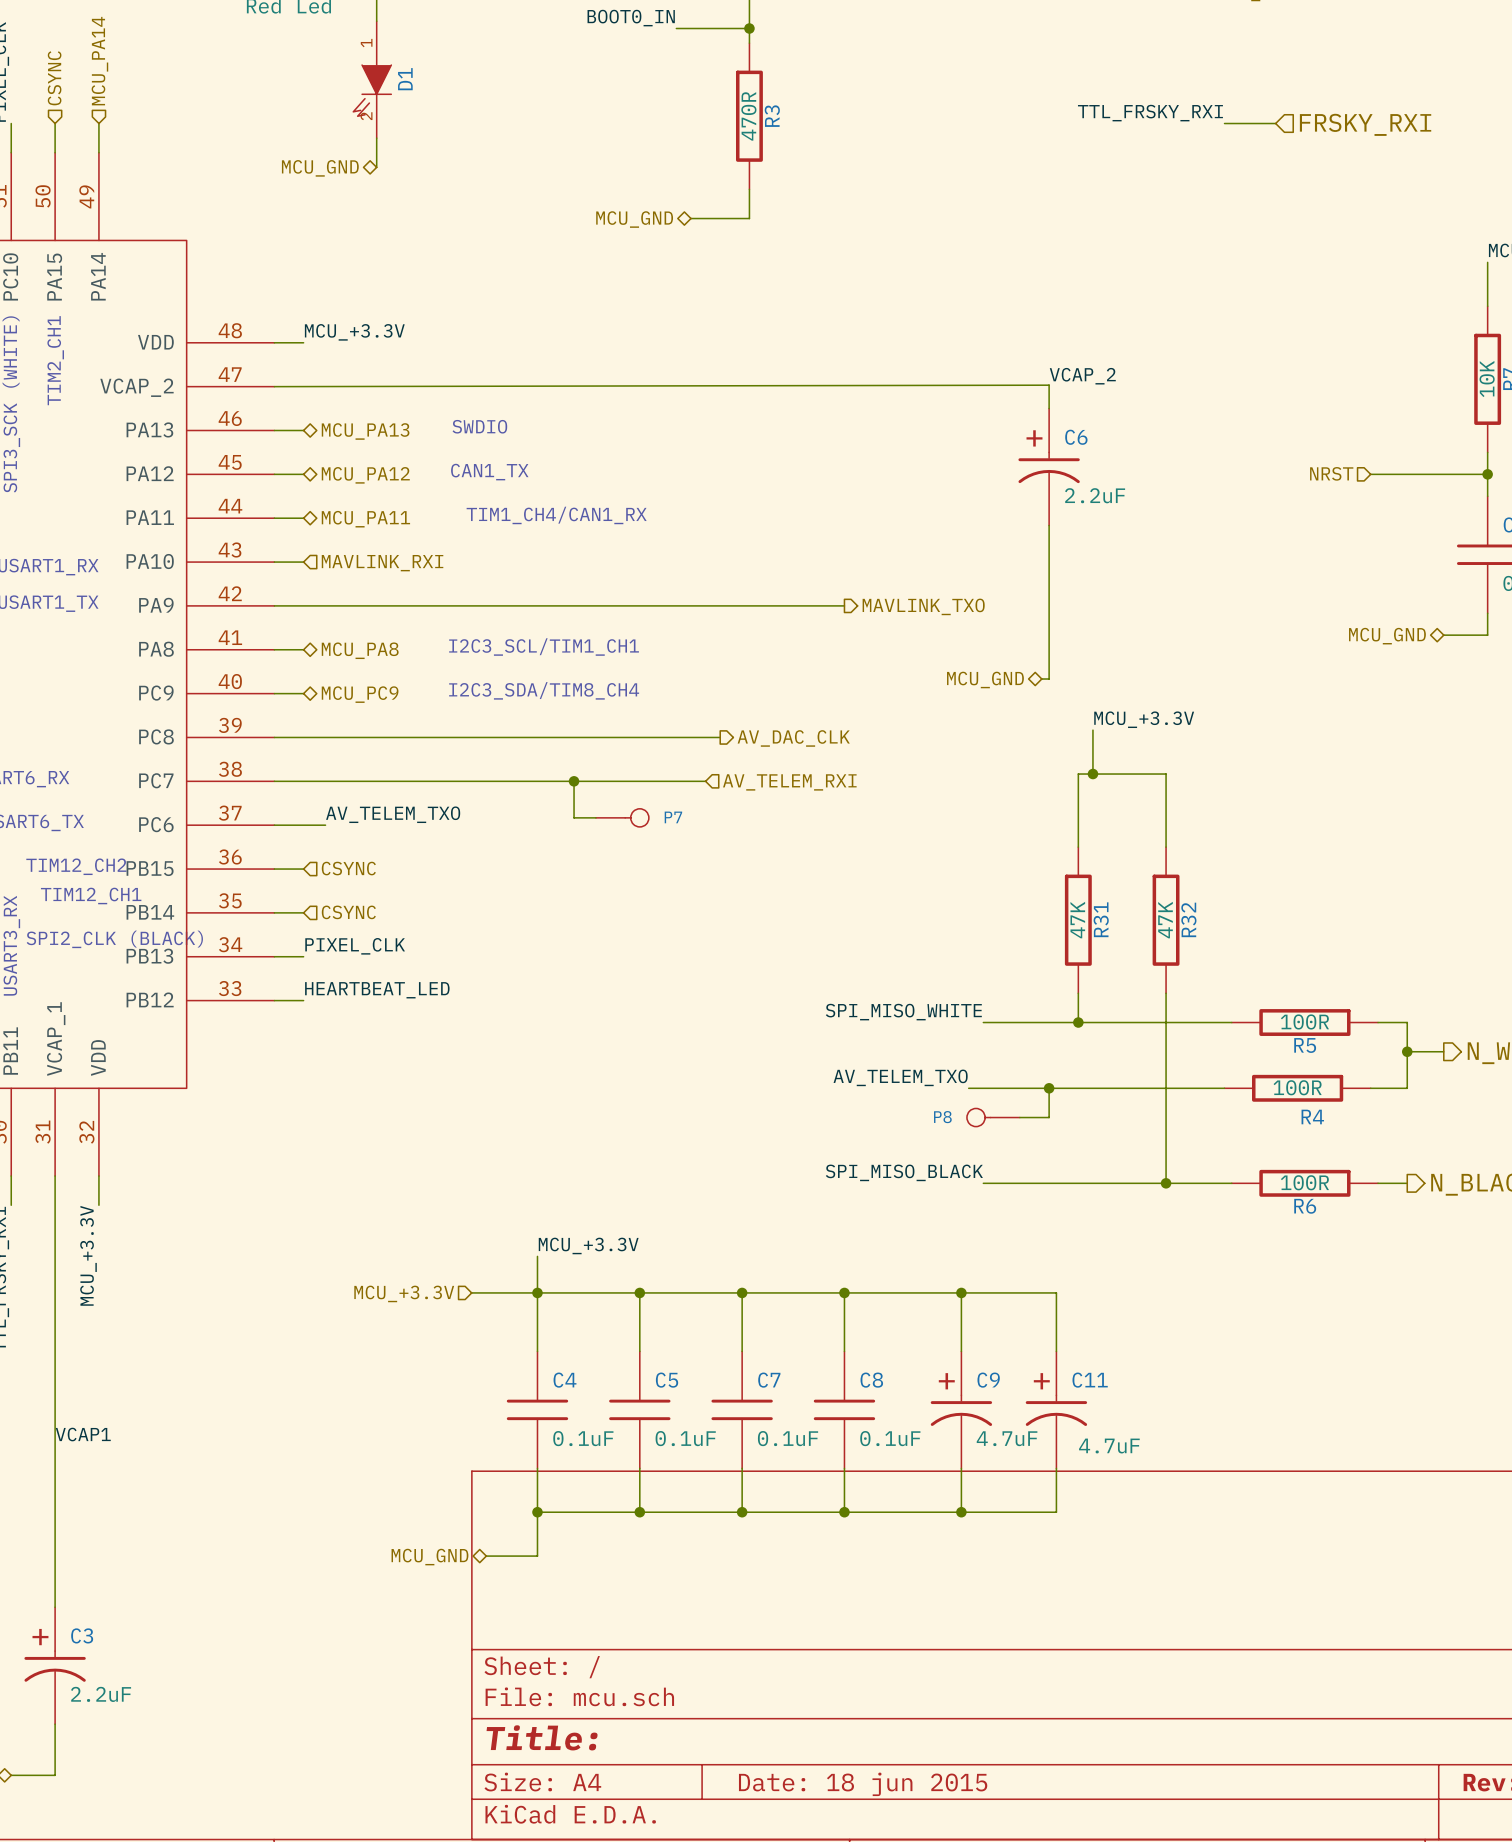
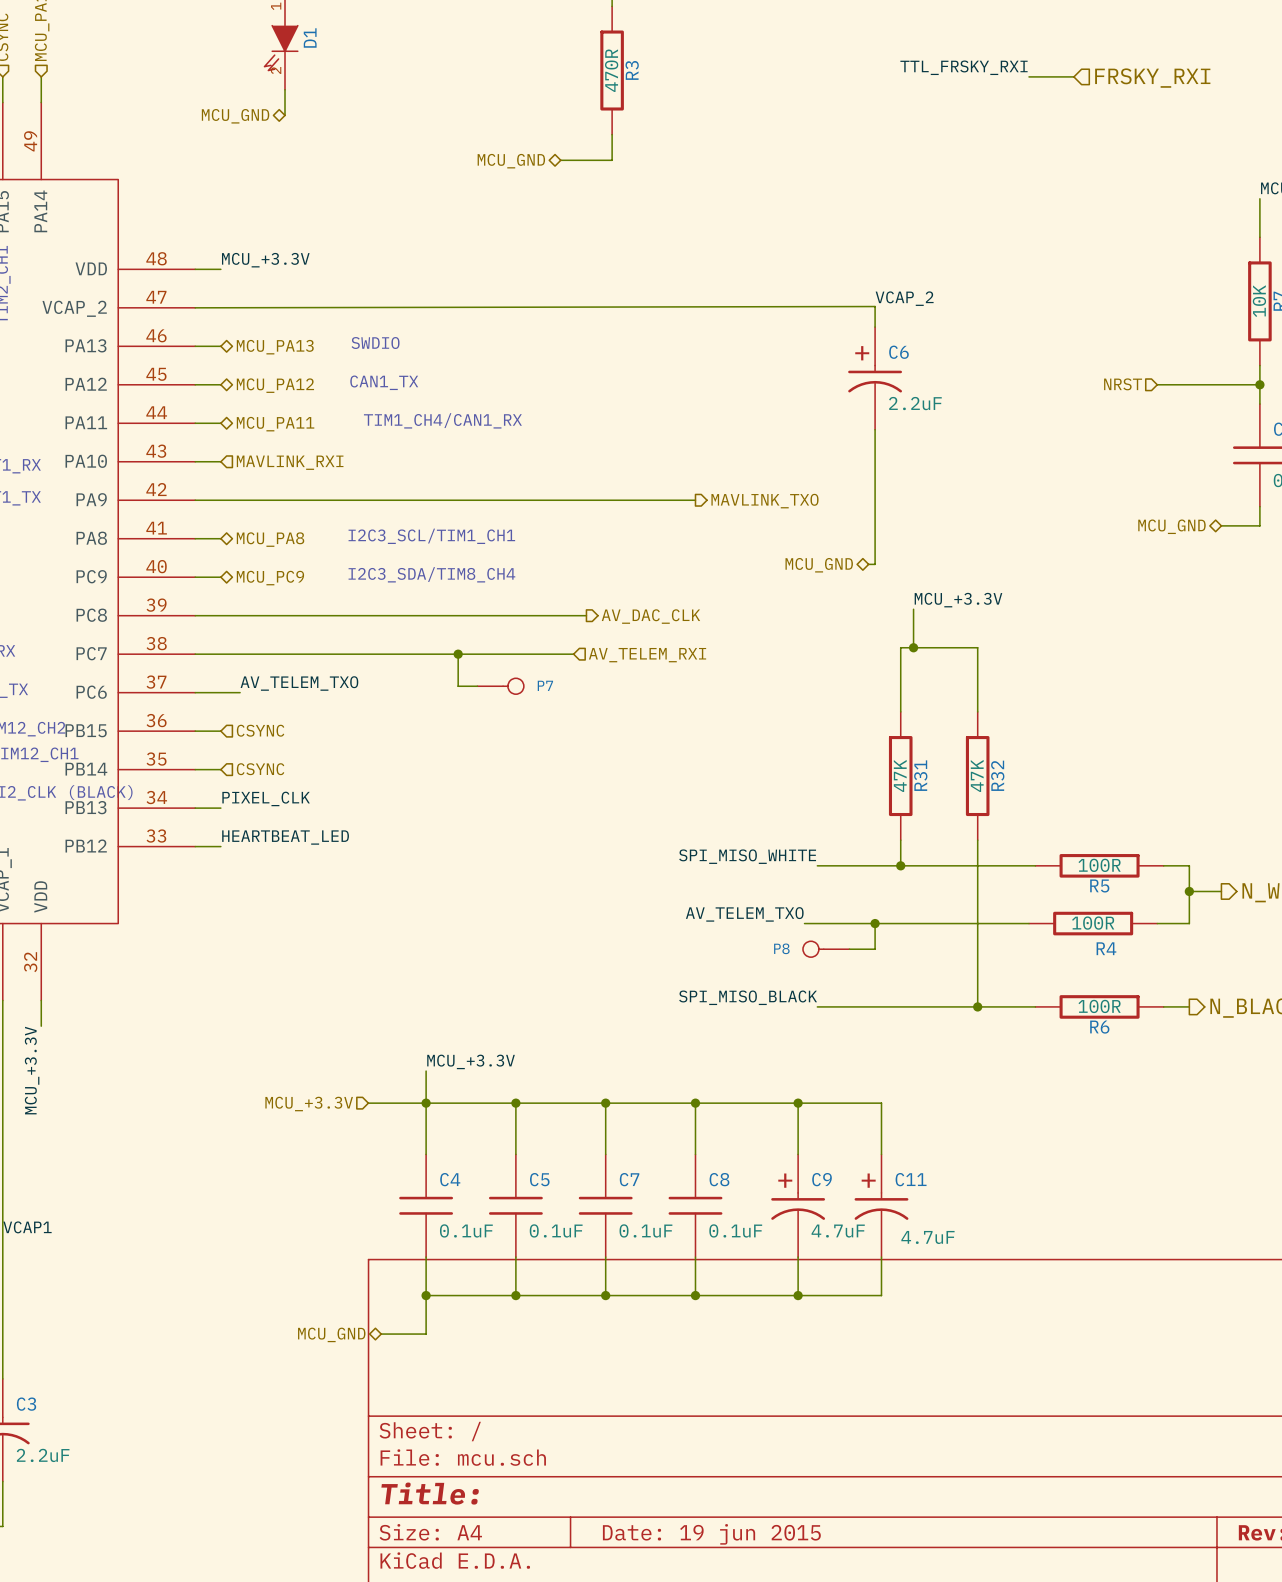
title block: Date: 18 jun 2015 (863, 1784) -> Date: 19 jun 2015 (711, 1534)

